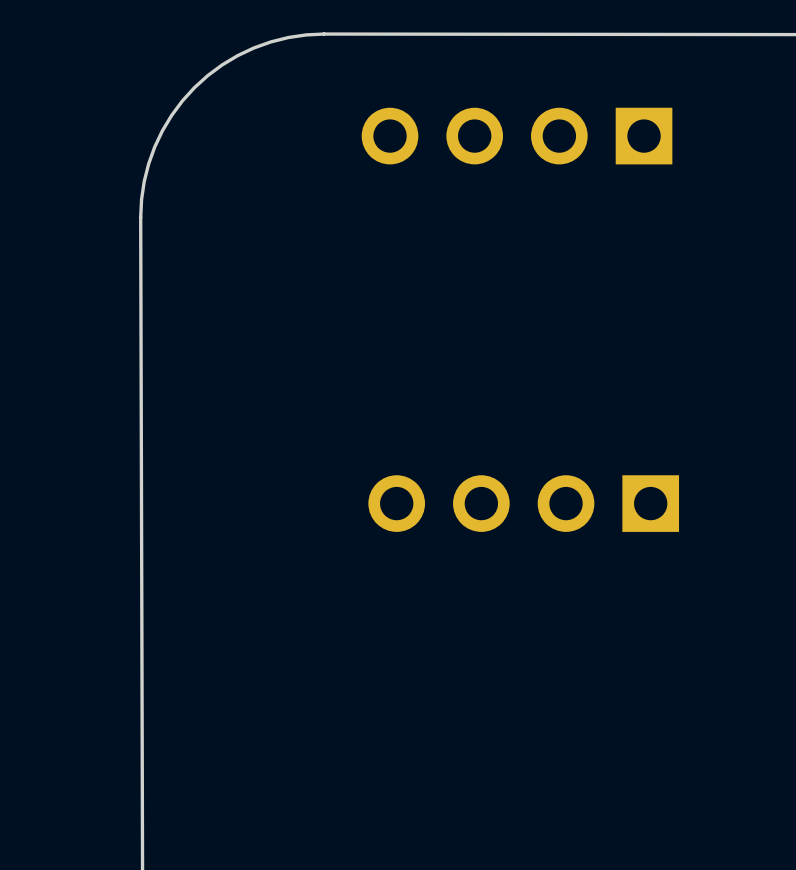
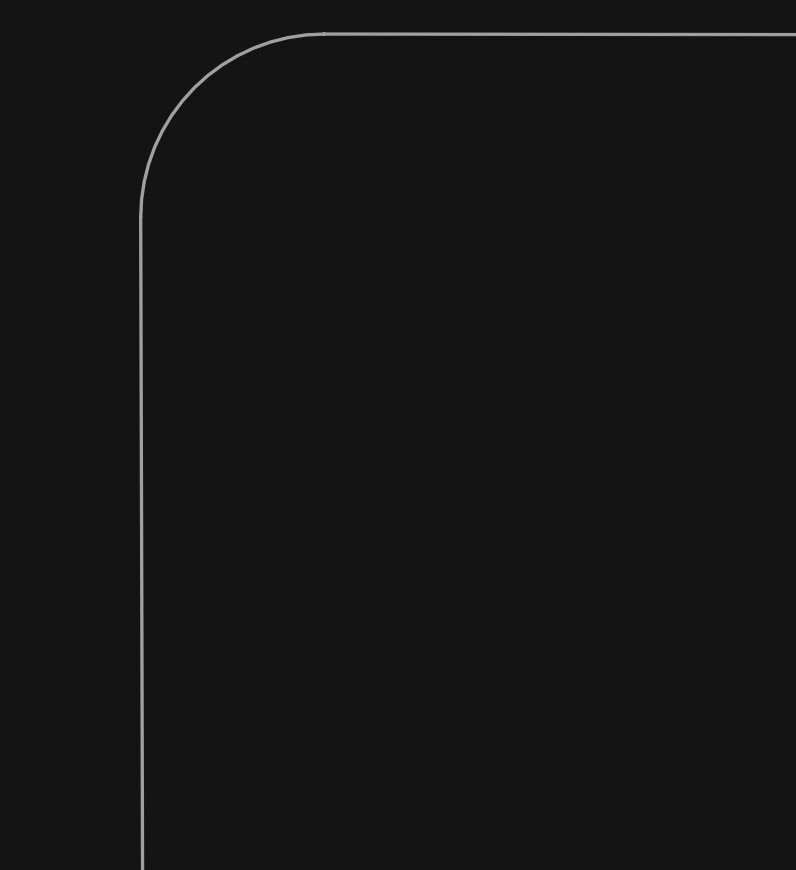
part: (517, 136) -> none
part: (523, 503) -> none

